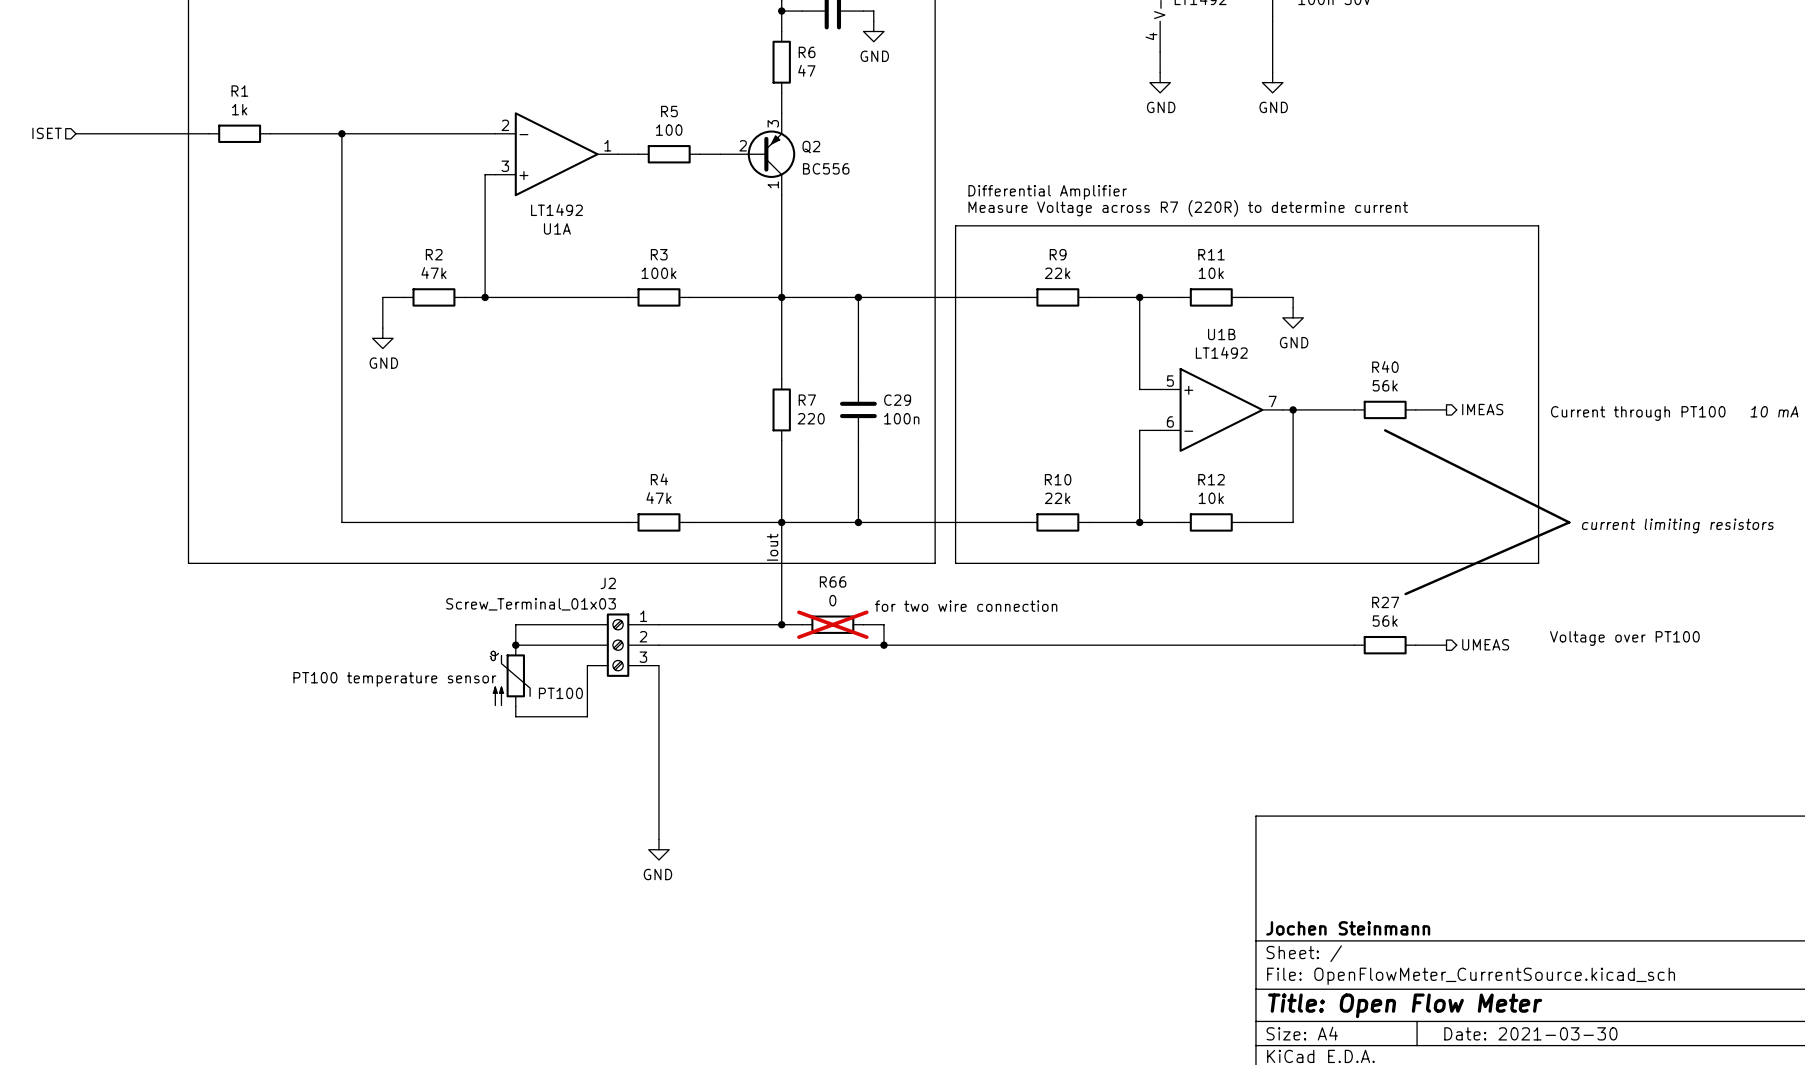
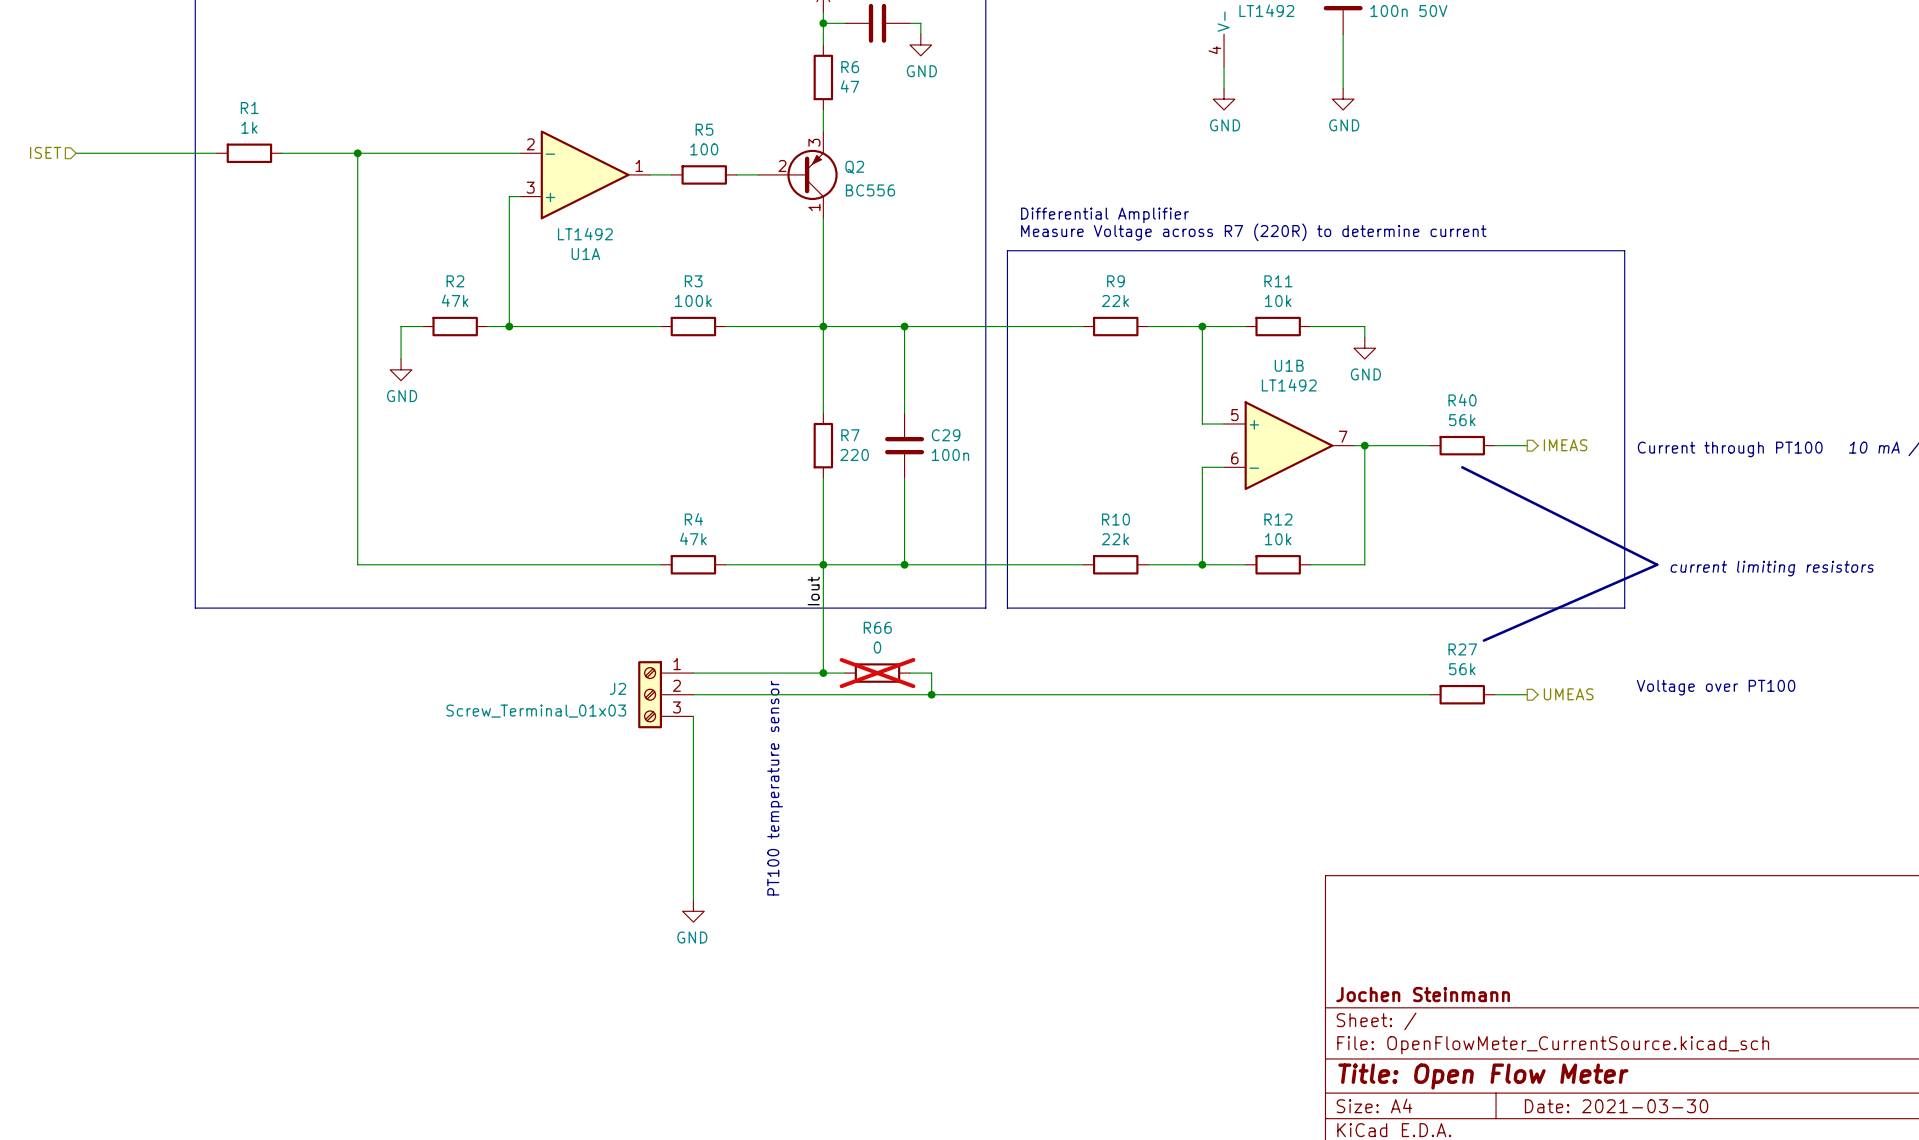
J2 name position: J2 (608, 583) -> J2 (618, 688)
J2 value position: Screw_Terminal_01x03 (531, 604) -> Screw_Terminal_01x03 (536, 711)
text: for two wire connection (966, 606) -> none
wire: (607, 624) (515, 624) (515, 645) (607, 645) -> none
junction: (515, 645) -> none
wire: (607, 665) (587, 665) (587, 716) (515, 716) (515, 706) -> none
part: PT100 (510, 675) -> none
text: PT100 temperature sensor (394, 679) -> none
text: none -> PT100 temperature sensor (775, 788)

